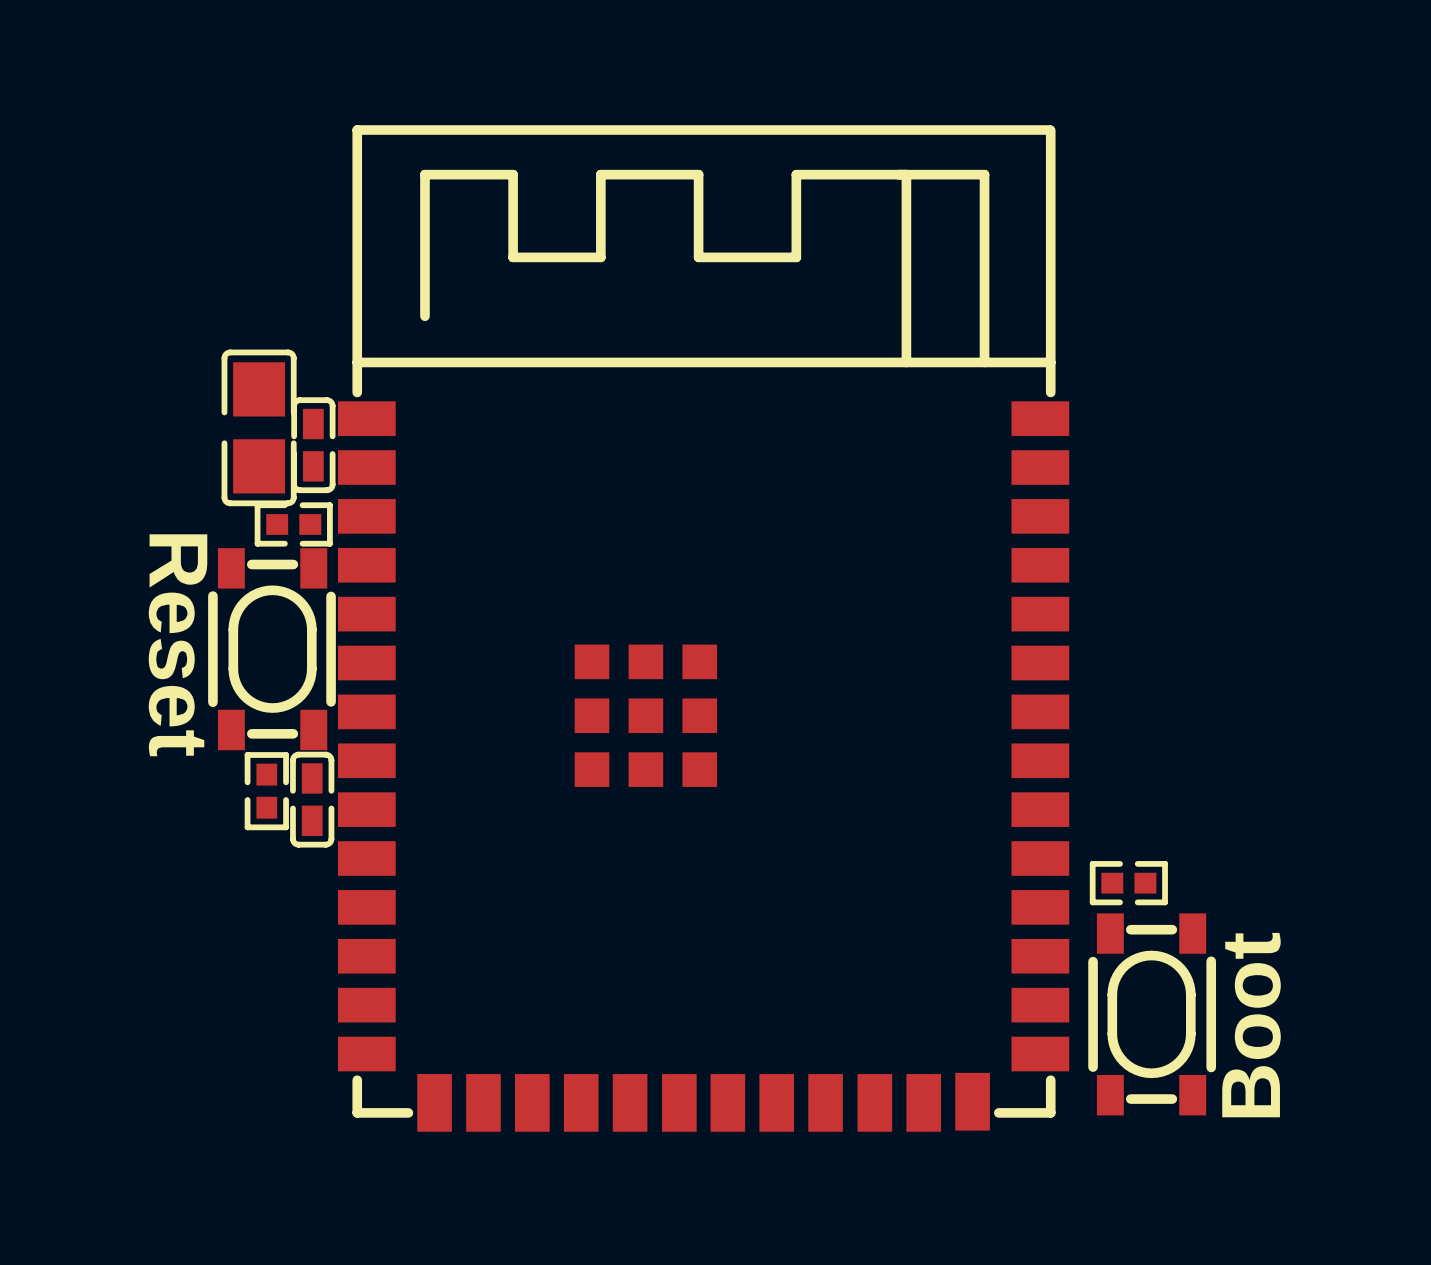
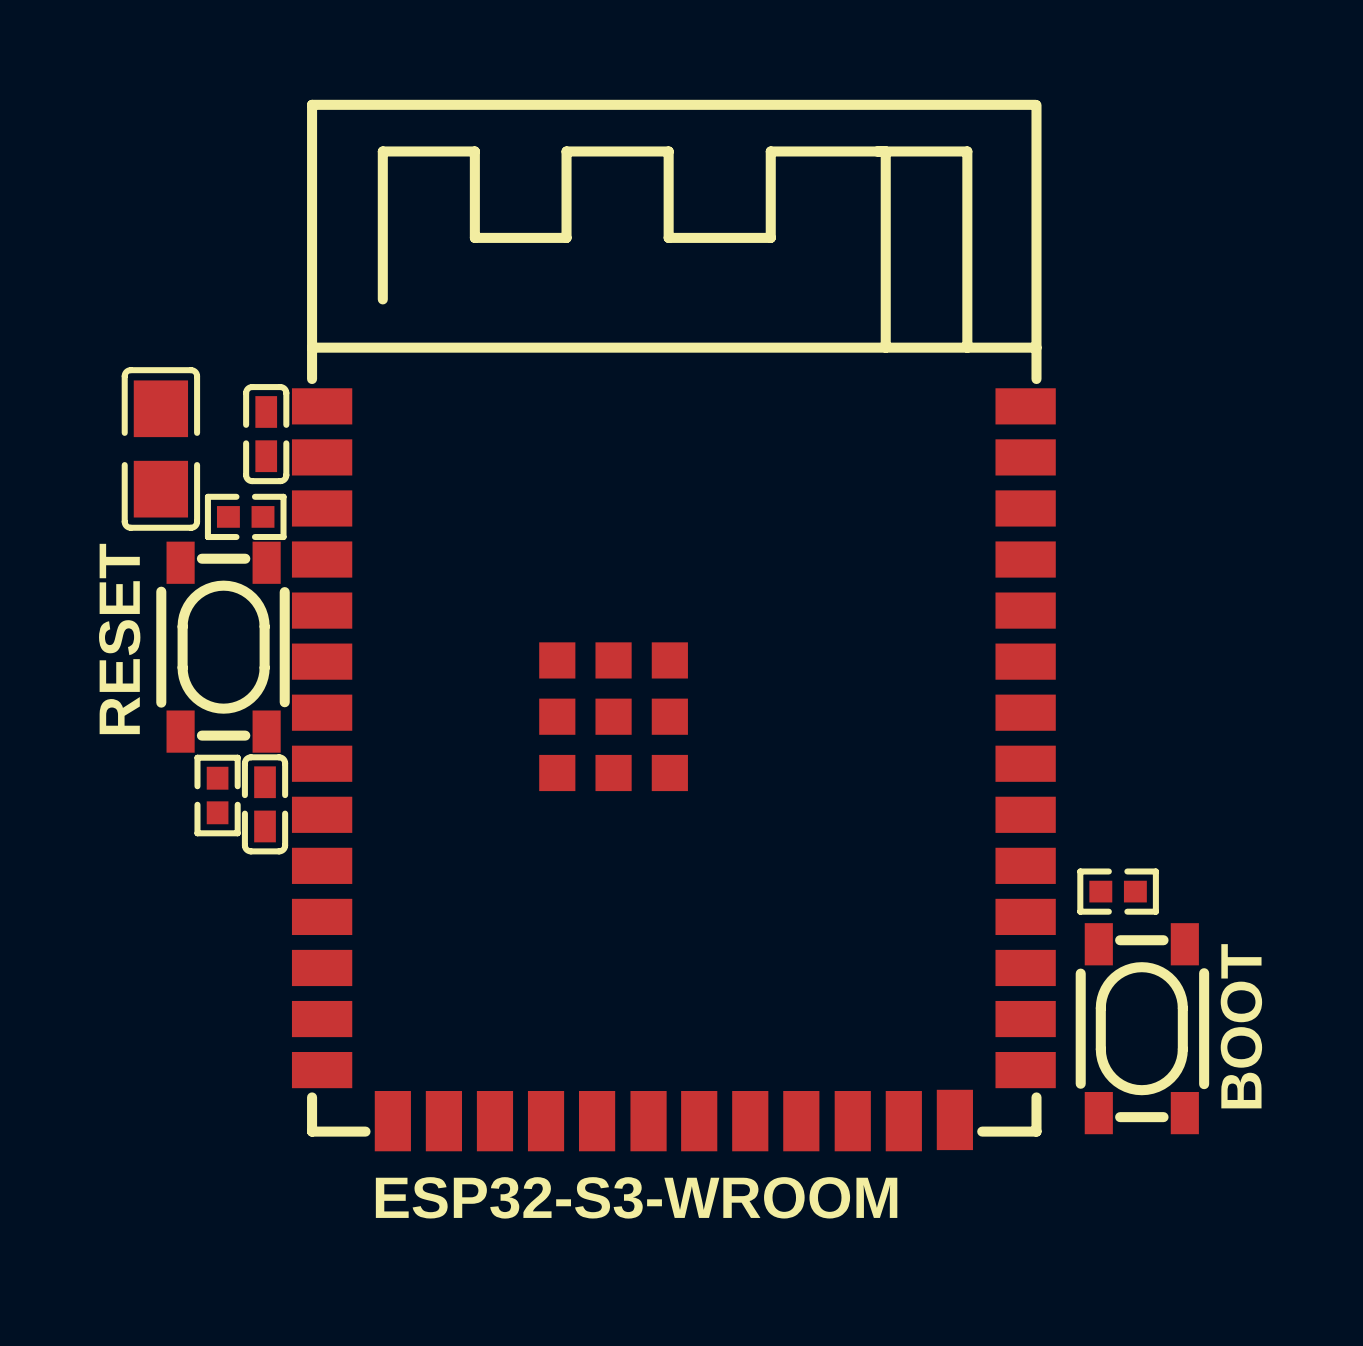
part position: (259, 427) -> (160, 448)
text: none -> RESET (119, 638)
text: Reset (178, 645) -> none
text: Boot (1251, 1025) -> BOOT (1241, 1026)
text: none -> ESP32-S3-WROOM (636, 1197)

